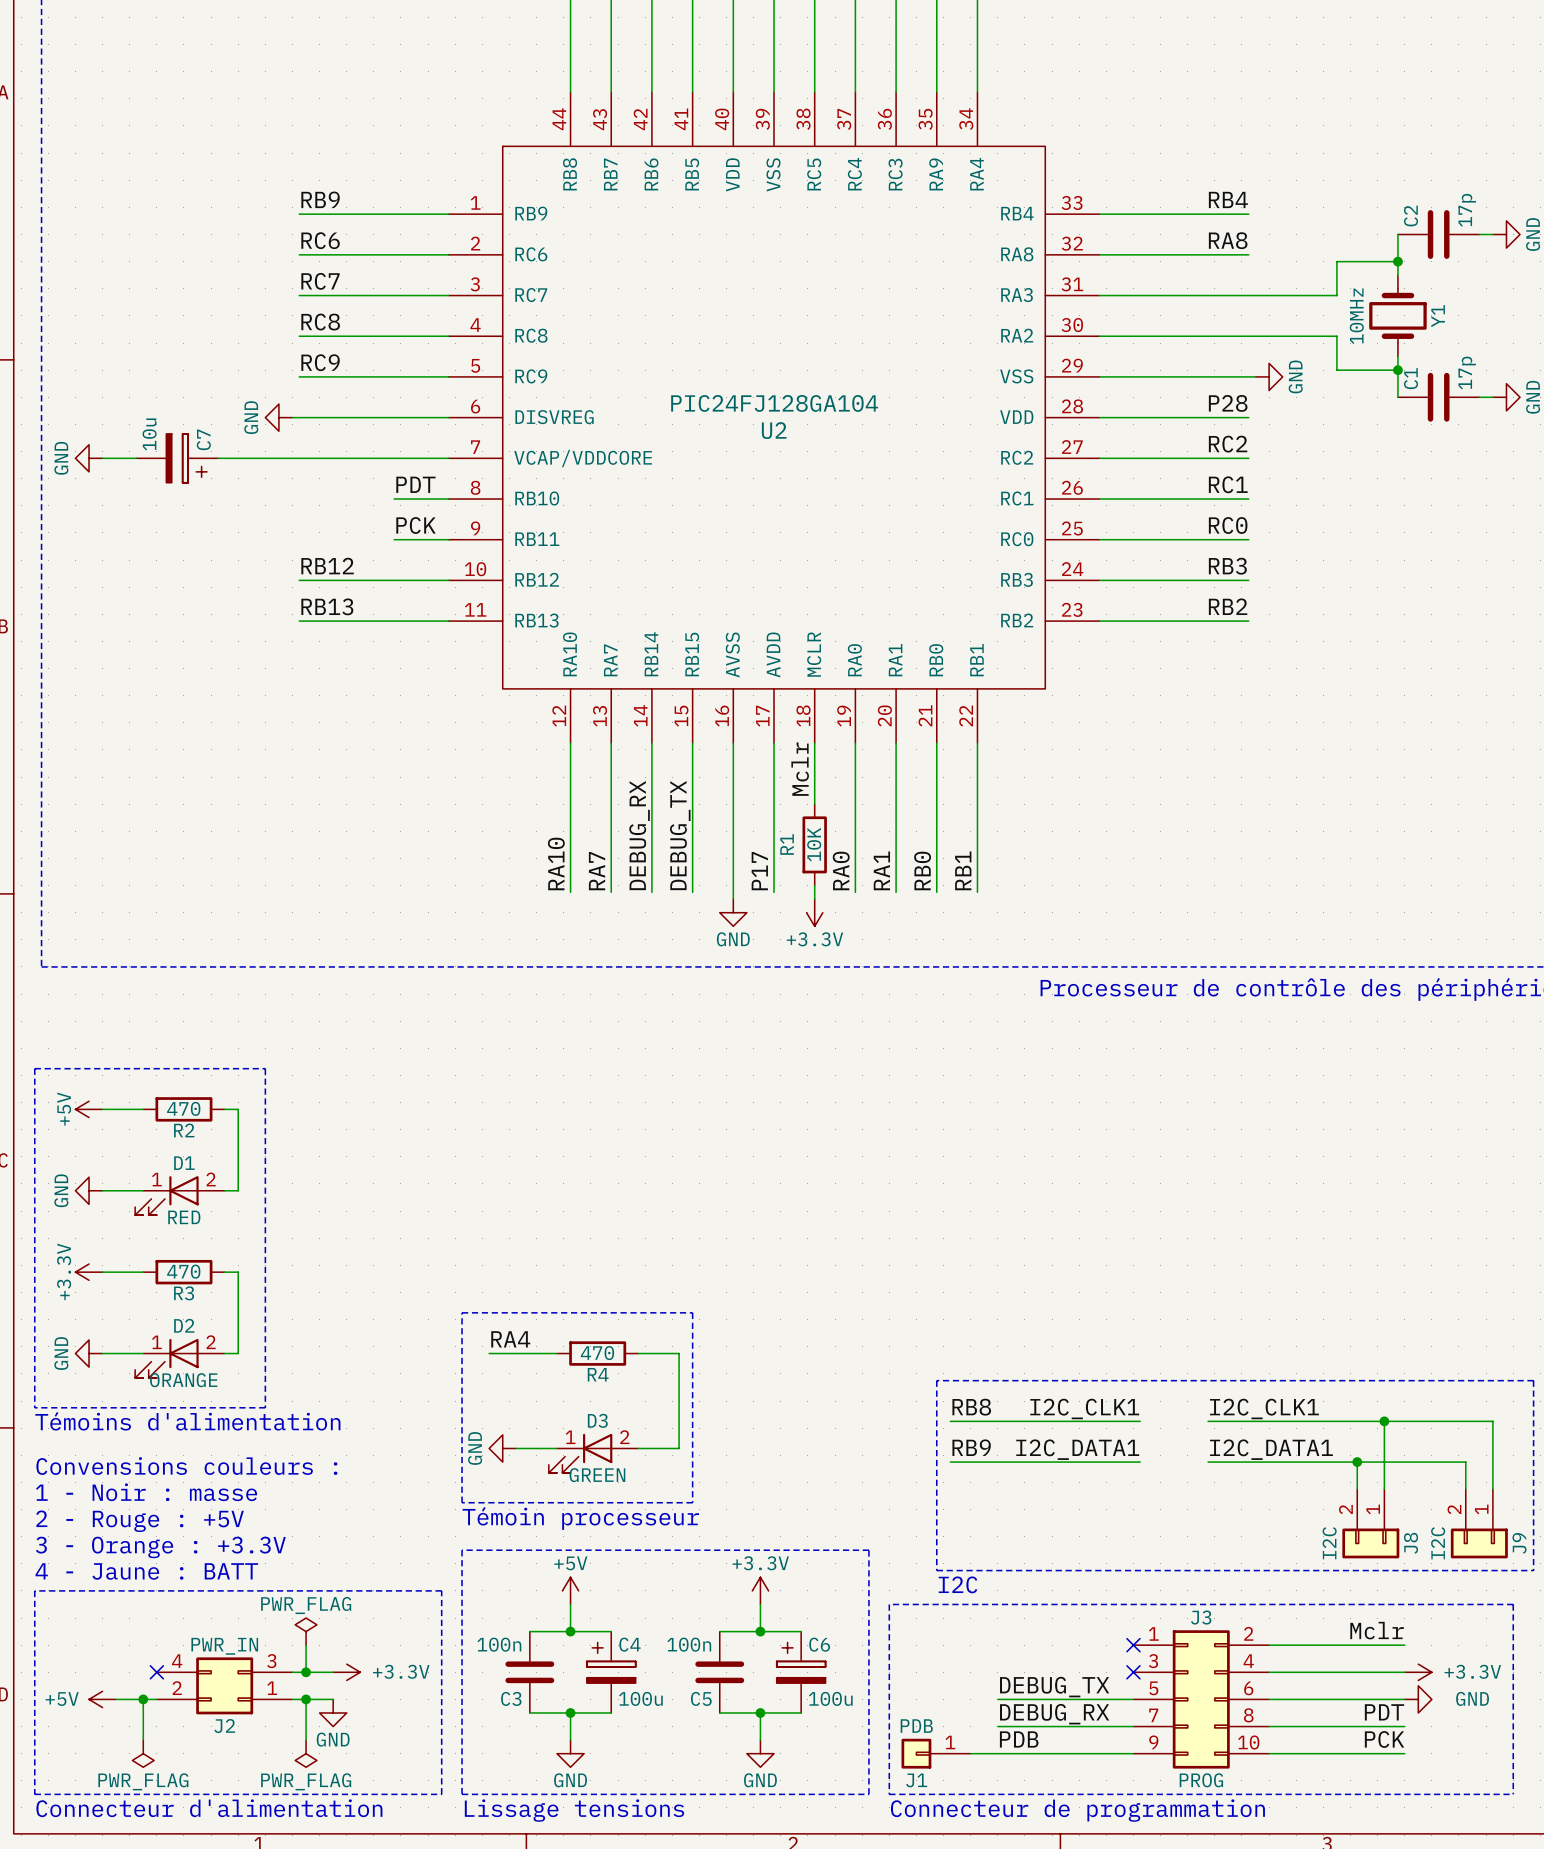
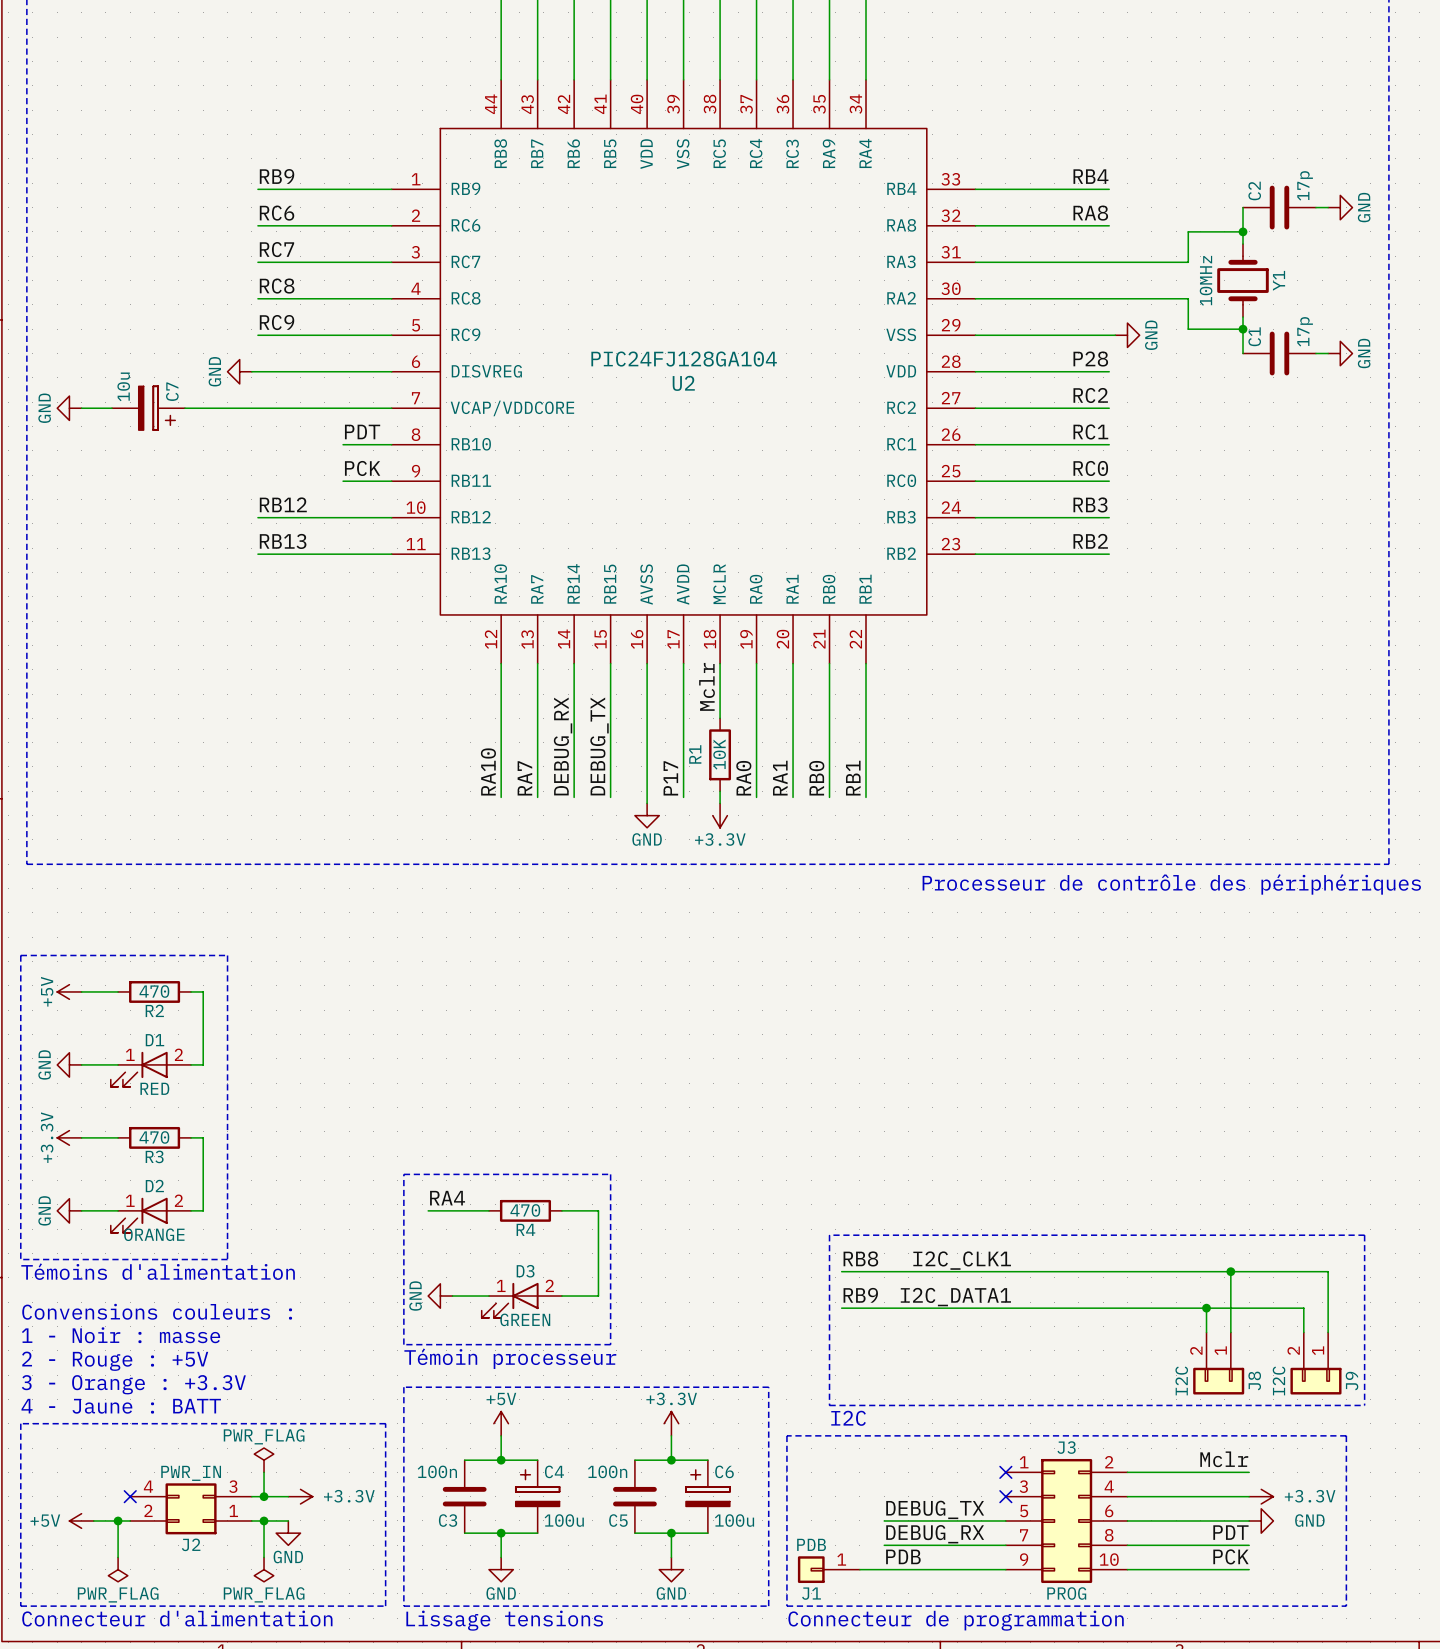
label: I2C_CLK1 (1264, 1408) -> none
wire: none -> (1011, 1271) (1072, 1271)
label: I2C_DATA1 (1271, 1449) -> none
wire: none -> (1011, 1308) (1072, 1308)

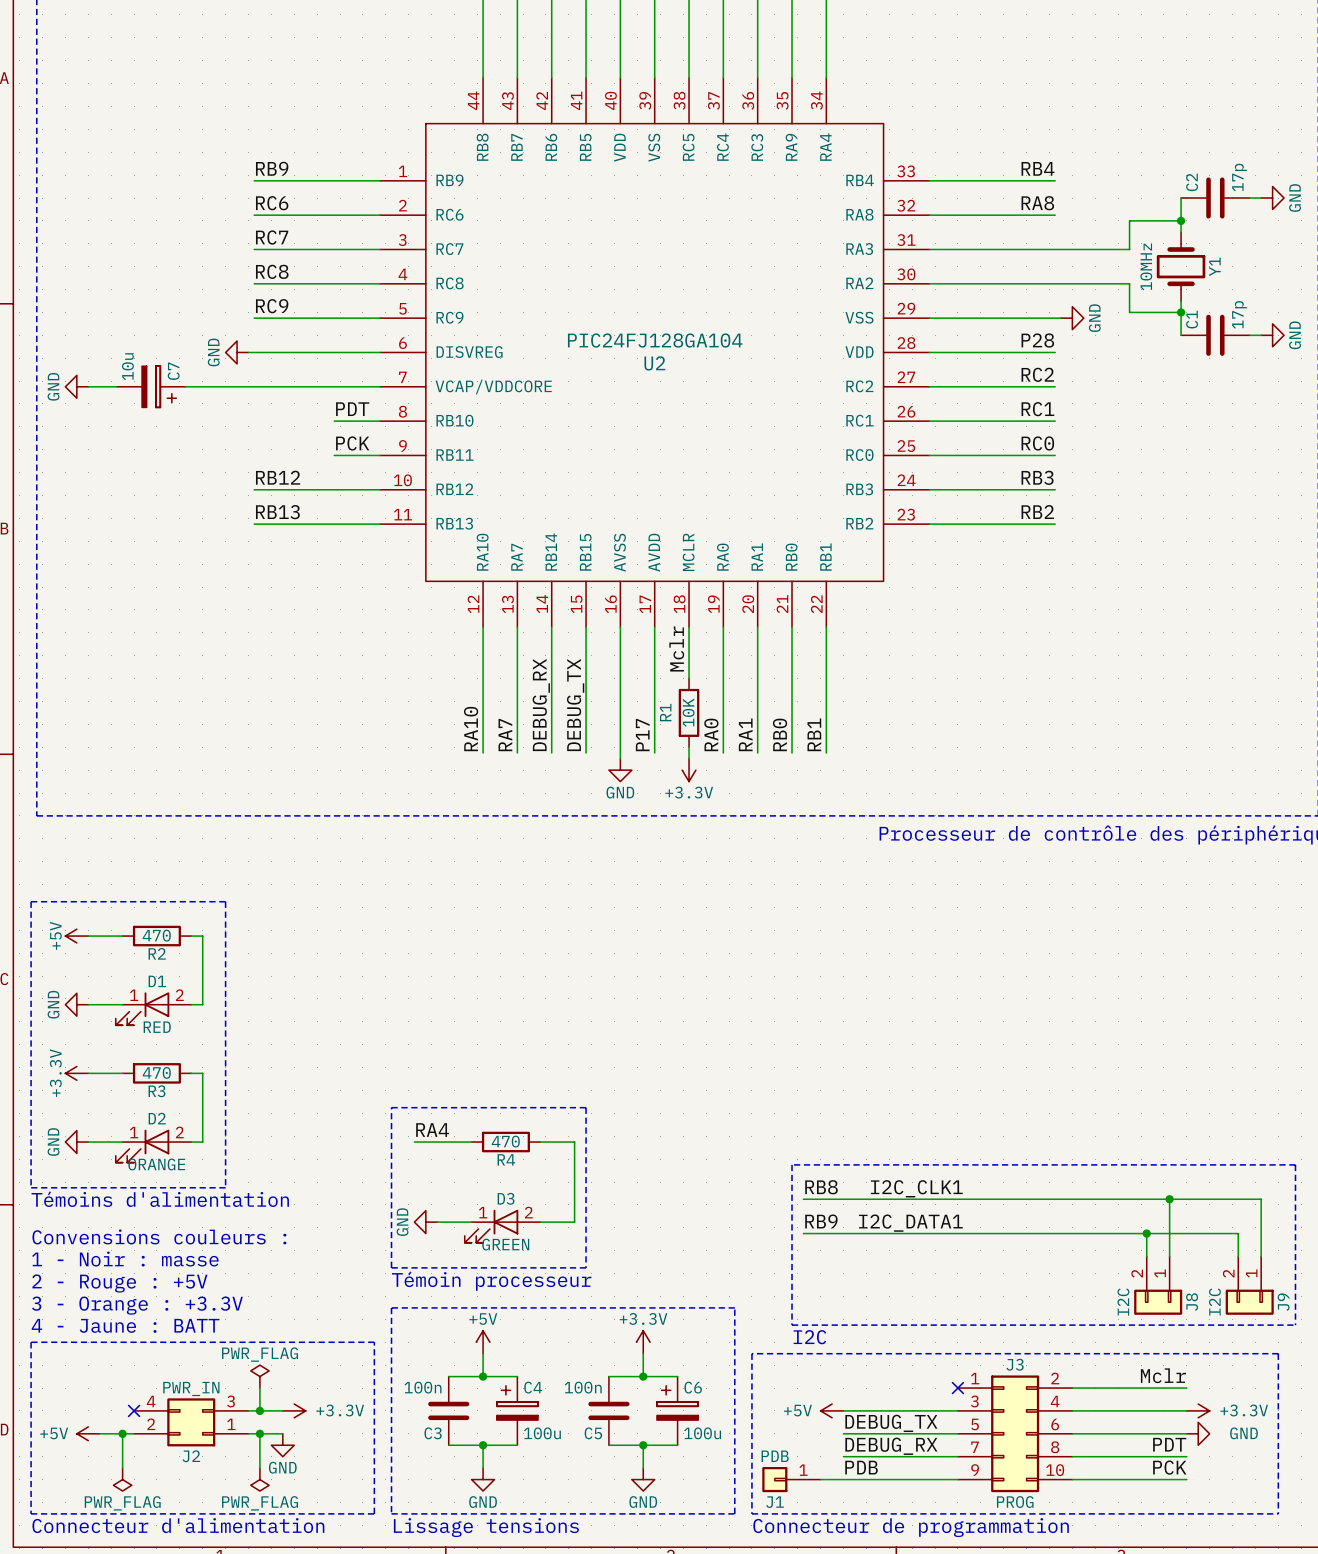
power symbol: none -> +5V (832, 1410)
wire: none -> (843, 1410) (957, 1410)
no-connect mark: (1005, 1496) -> none

